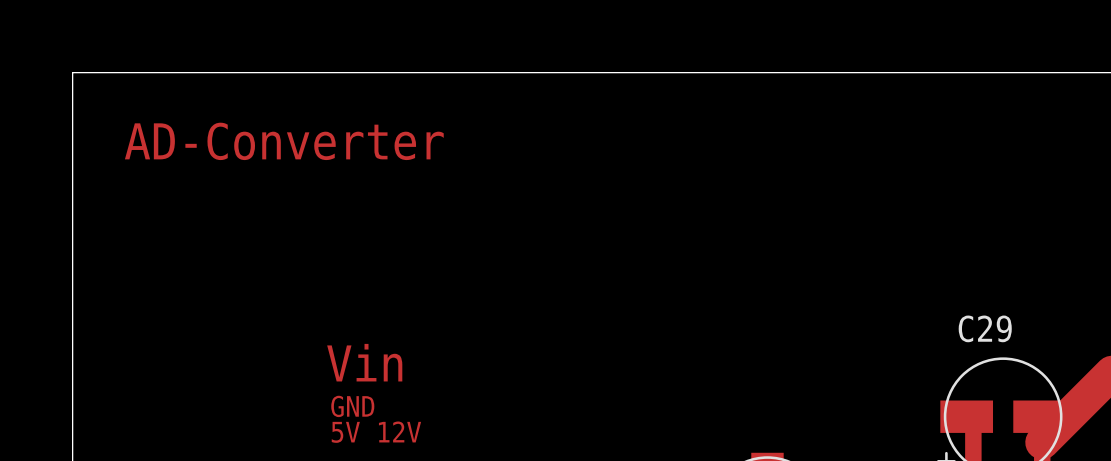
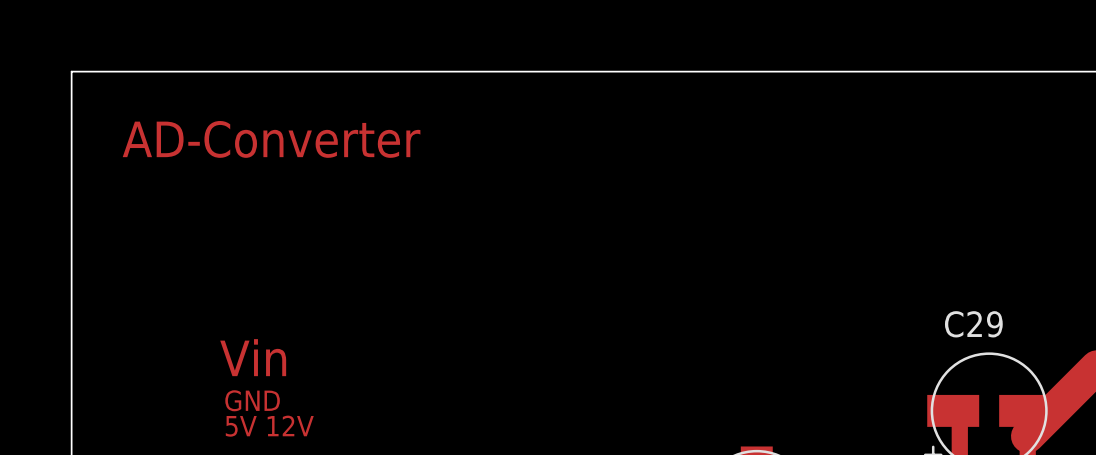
text position: Vin (364, 362) -> Vin (253, 357)
text position: GND (352, 406) -> GND (252, 400)
text position: 5V 12V (376, 432) -> 5V 12V (269, 426)

